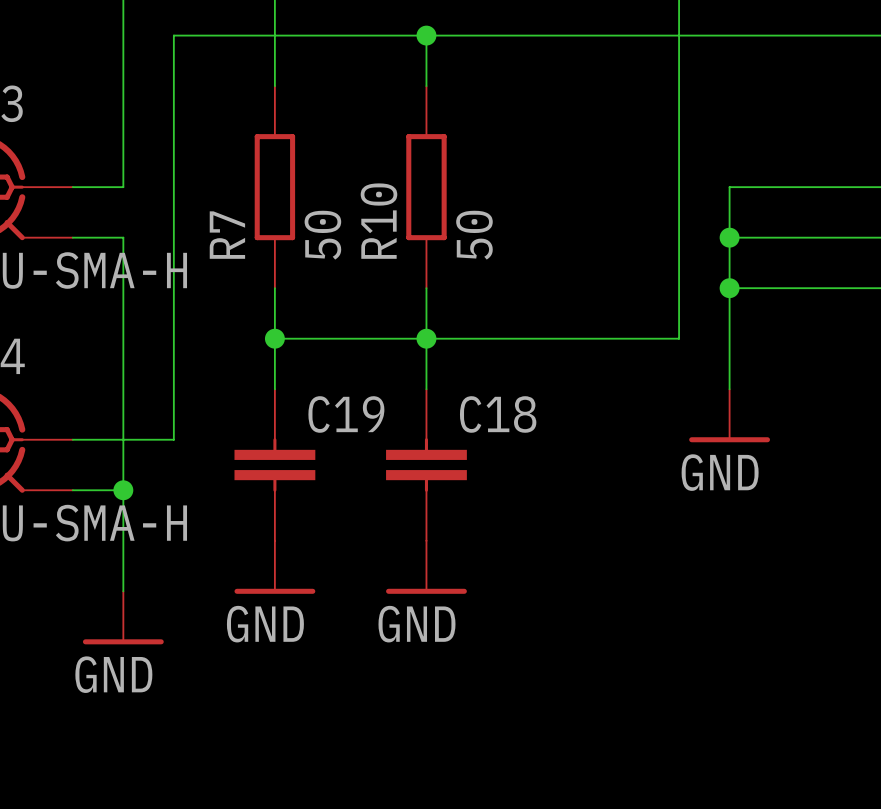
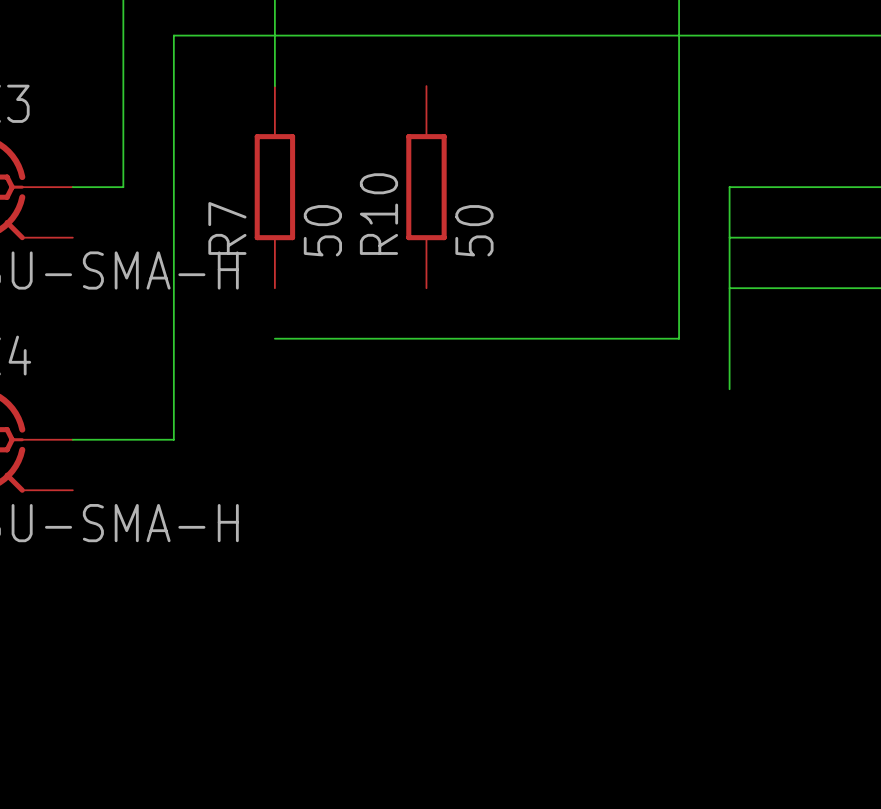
wire: (426, 35) (426, 86) -> none
junction: (426, 35) -> none
wire: (72, 237) (123, 237) (123, 591) -> none
junction: (729, 237) -> none
wire: (274, 288) (274, 389) -> none
wire: (426, 288) (426, 389) -> none
junction: (729, 288) -> none
junction: (274, 338) -> none
junction: (426, 338) -> none
power symbol: GND (729, 415) -> none
C19: (274, 465) -> none
C18: (426, 465) -> none
wire: (72, 490) (123, 490) -> none
junction: (123, 490) -> none
power symbol: GND (274, 567) -> none
power symbol: GND (426, 567) -> none
power symbol: GND (123, 617) -> none

